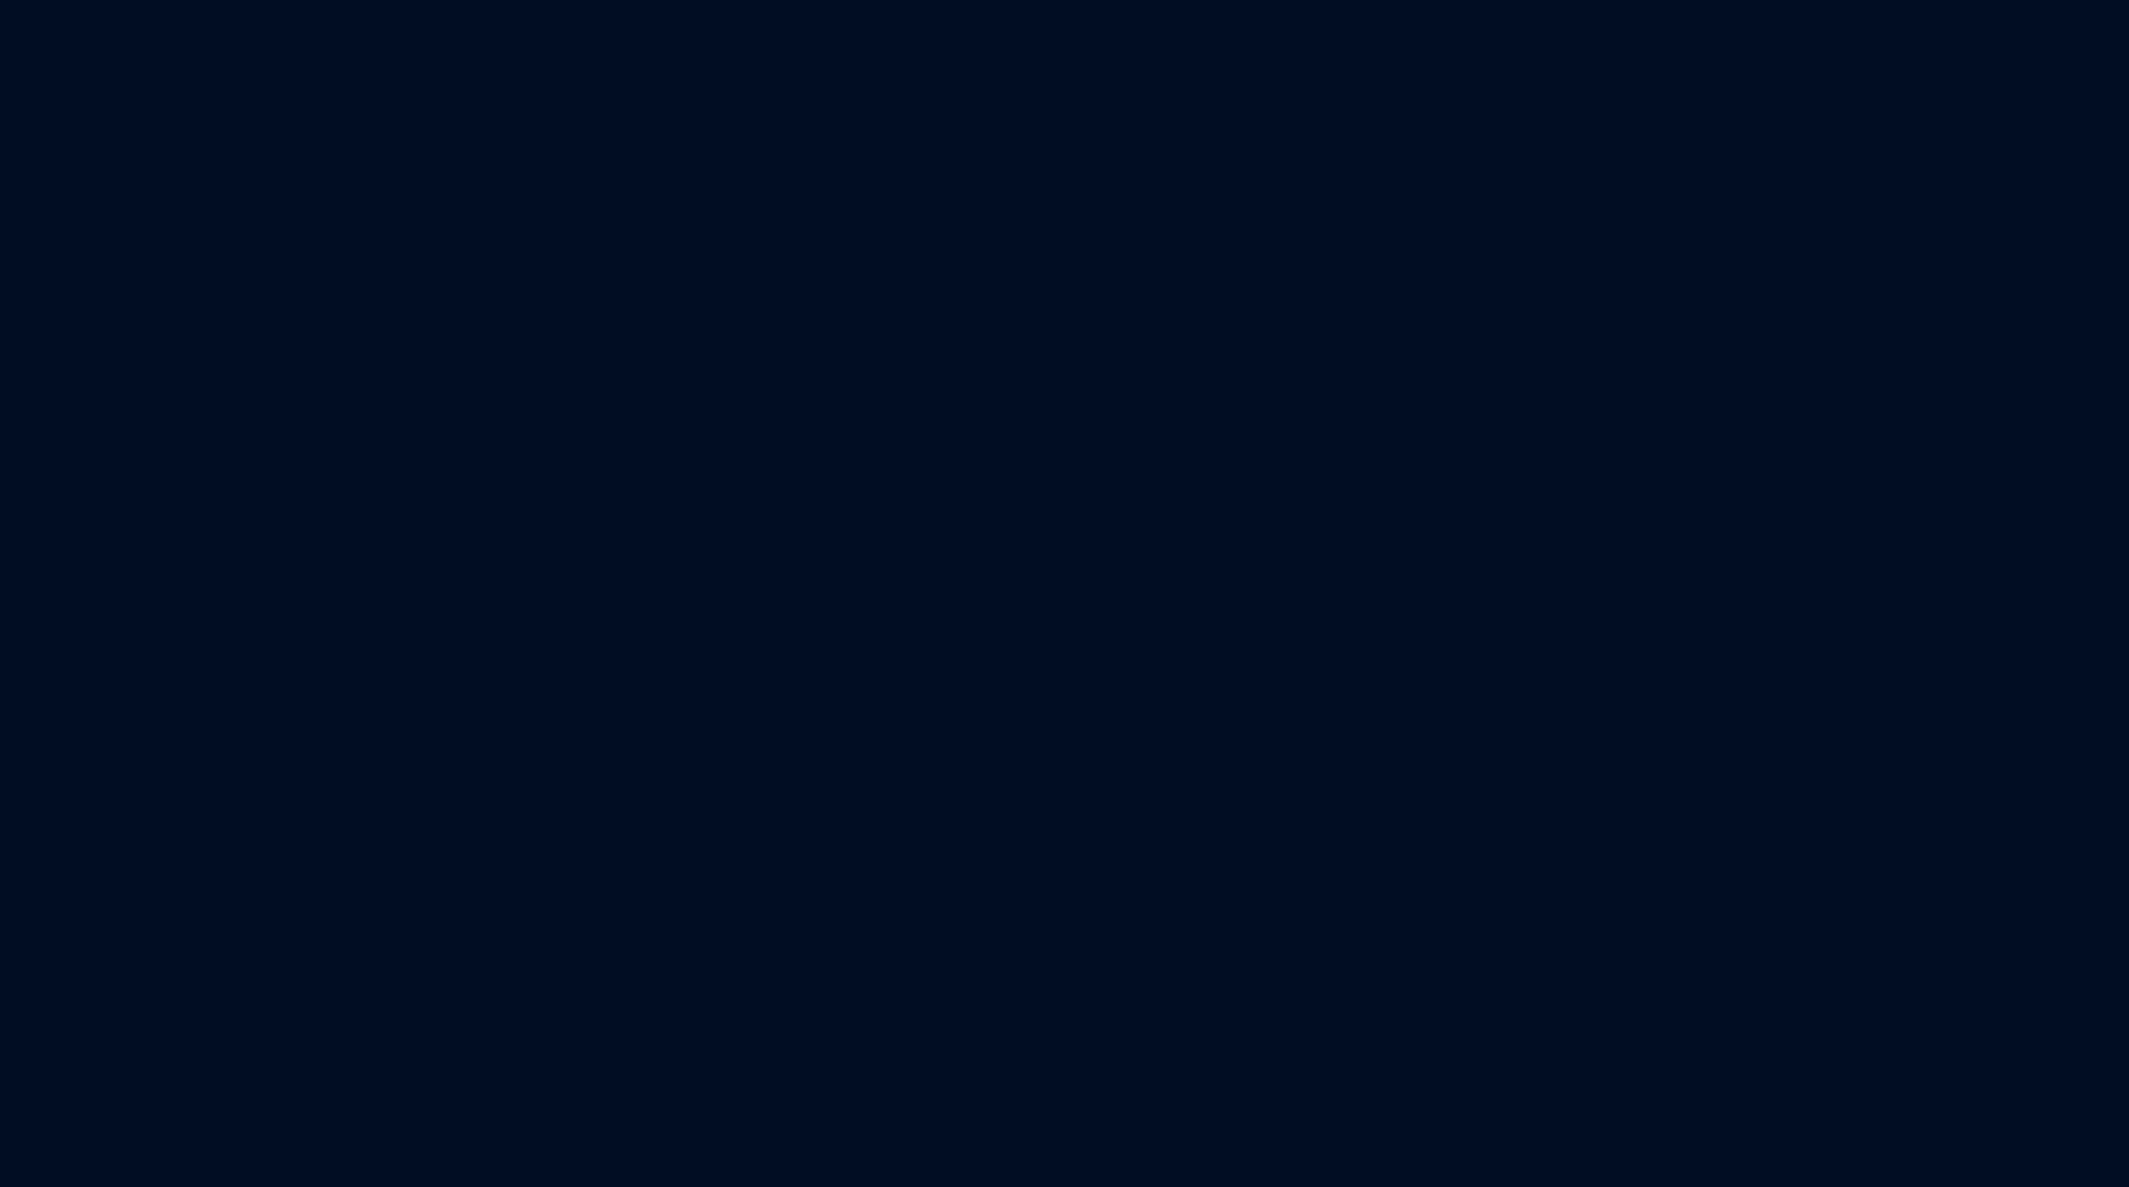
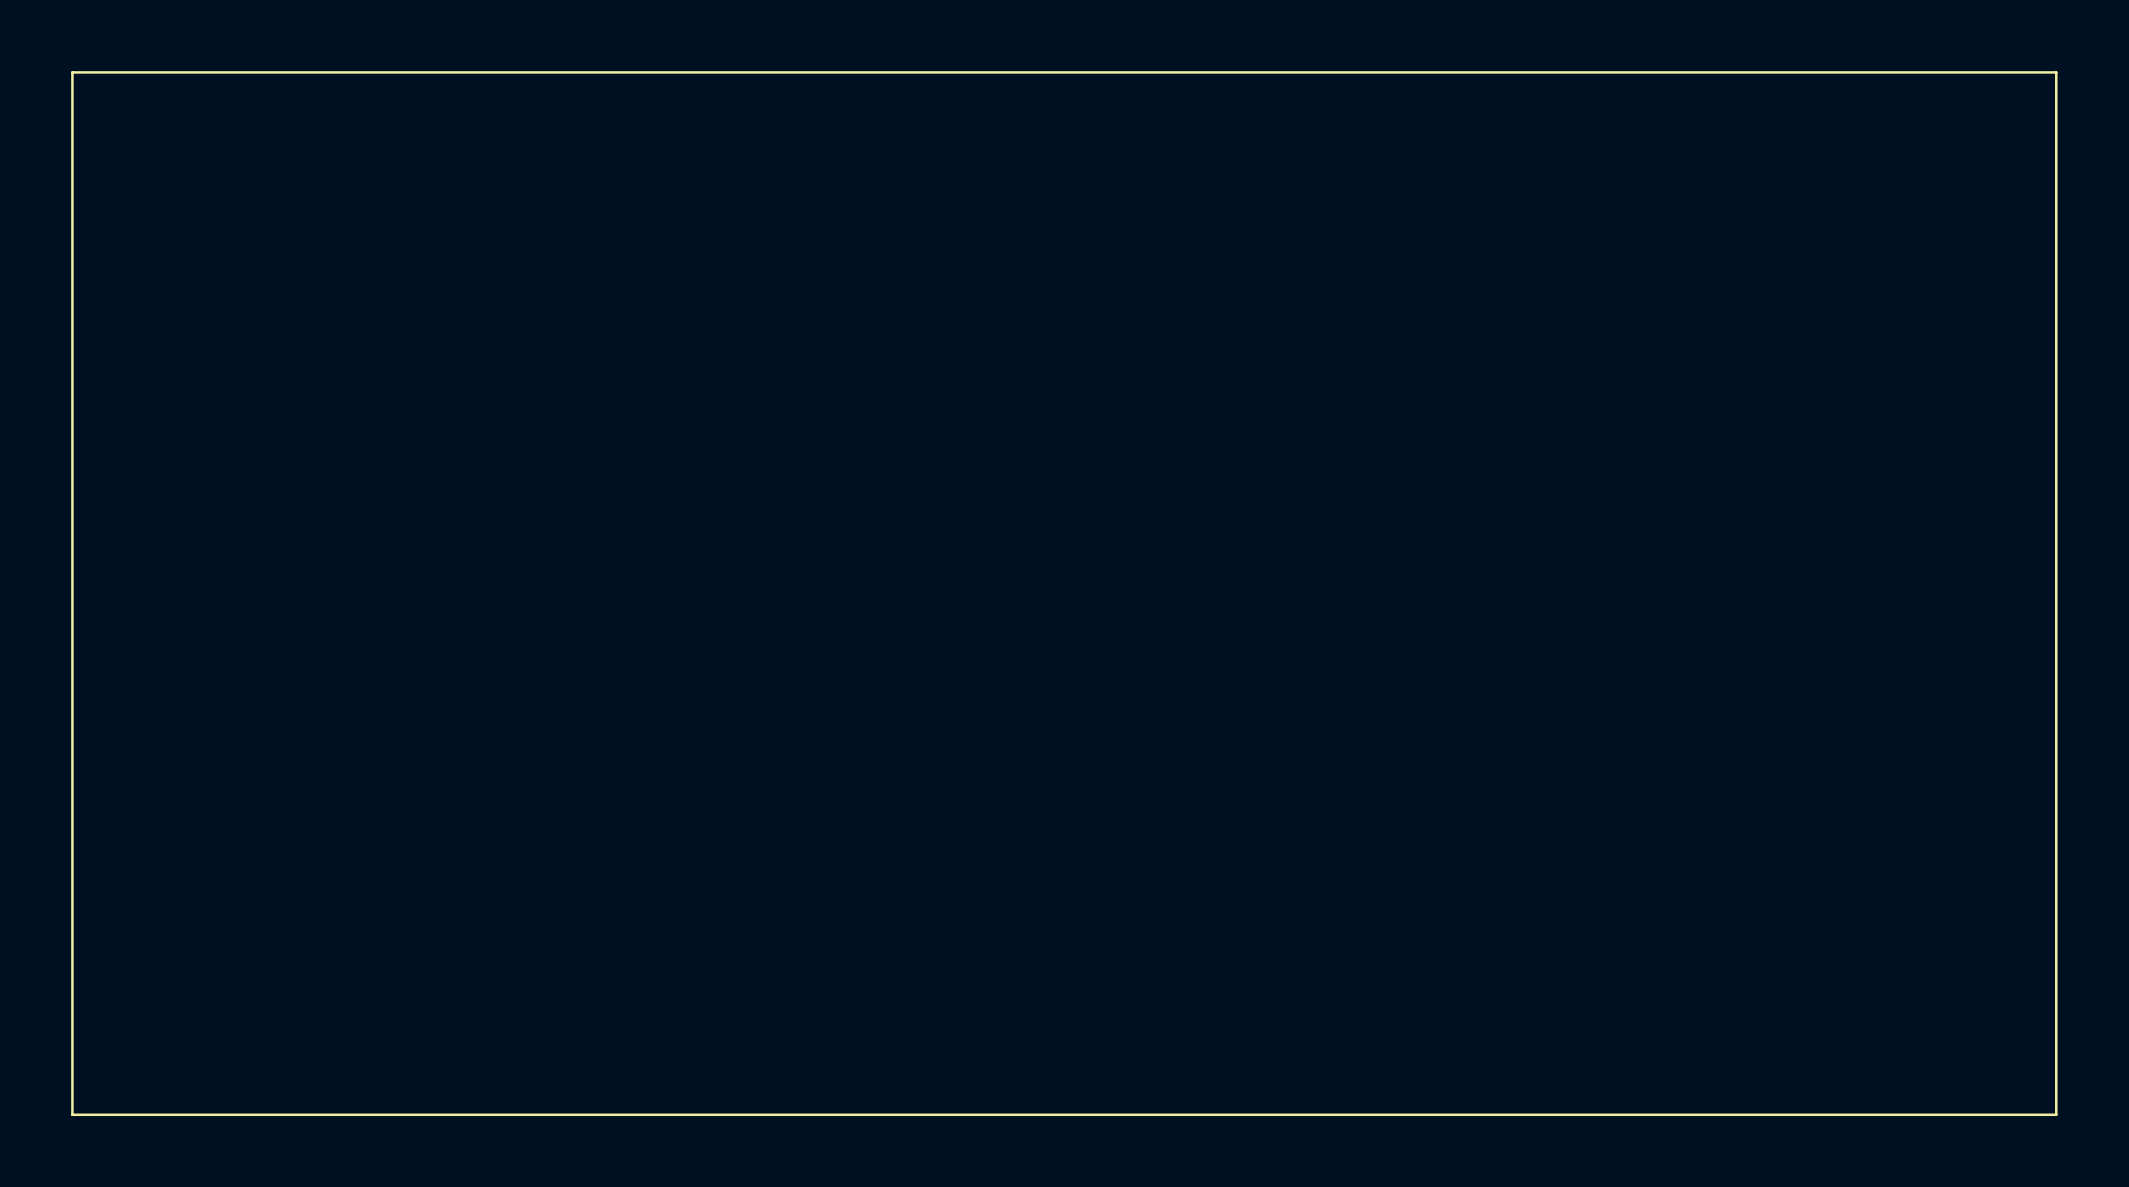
line: none -> (72, 72) (2056, 72) (2056, 1114) (72, 1114) (72, 72)

